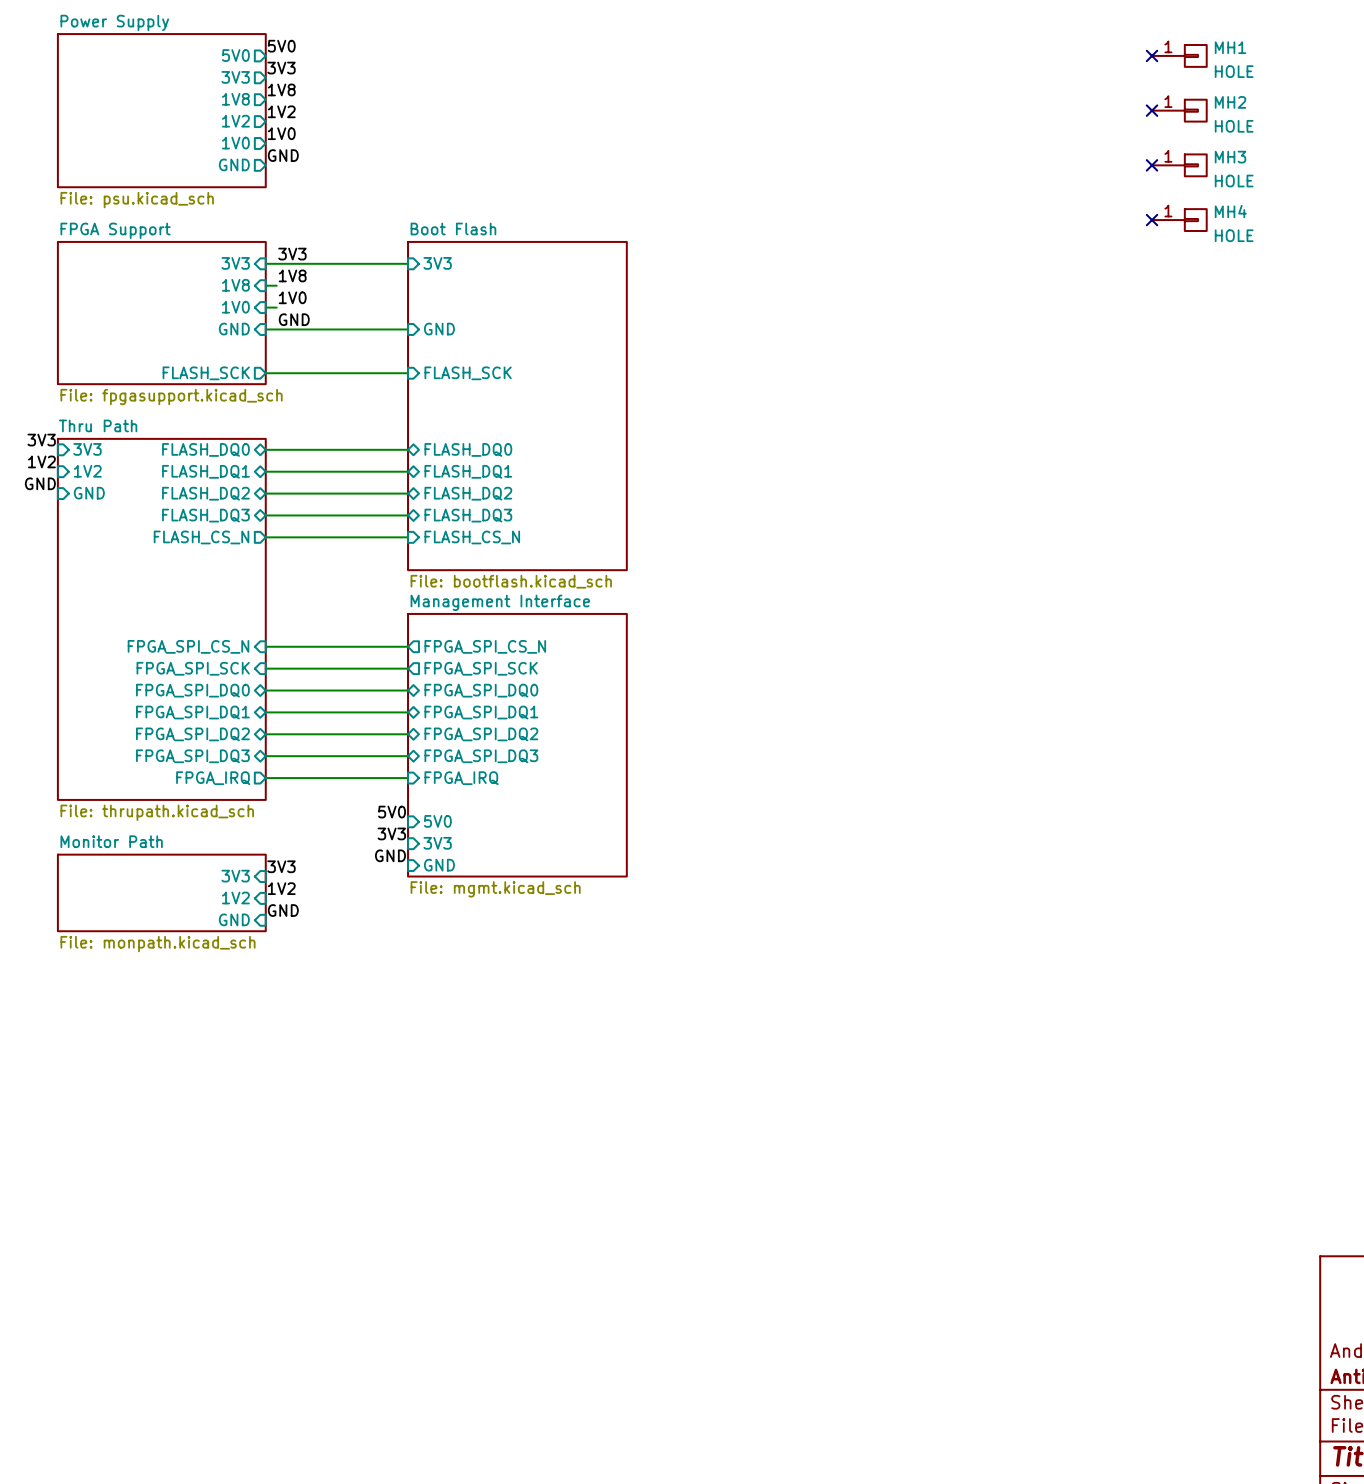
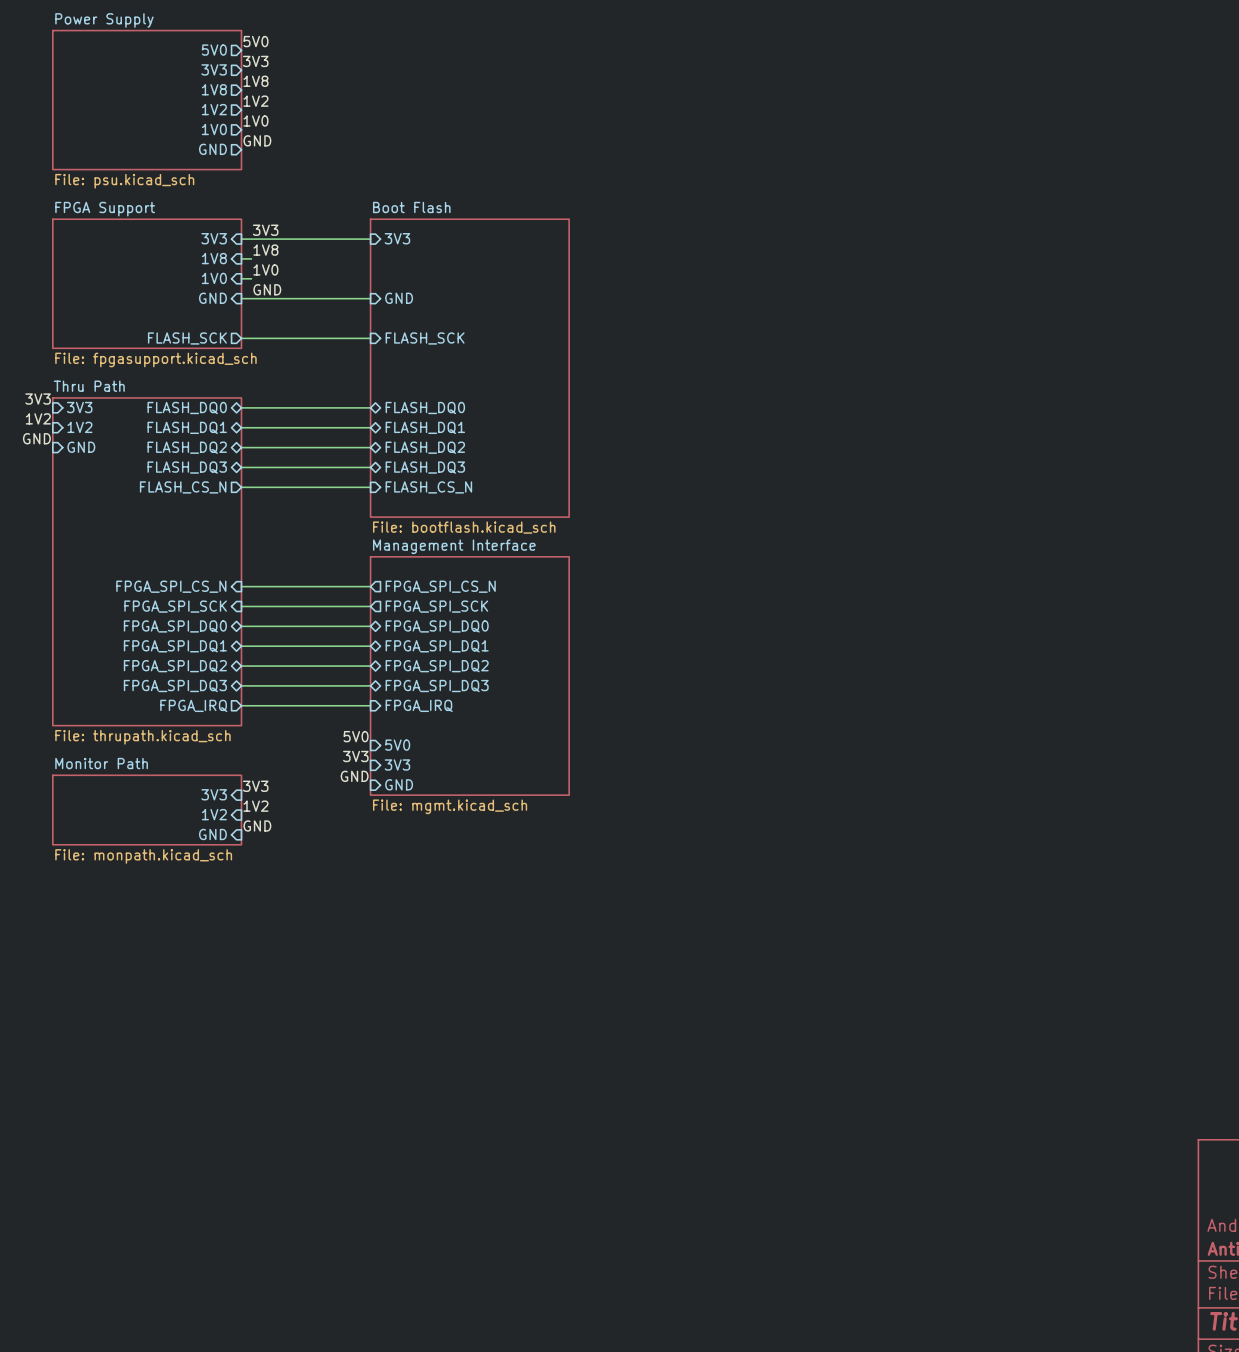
no-connect mark: (1152, 55) -> none
MH1: HOLE (1179, 55) -> none
no-connect mark: (1152, 110) -> none
MH2: HOLE (1179, 110) -> none
no-connect mark: (1152, 165) -> none
MH3: HOLE (1179, 165) -> none
no-connect mark: (1152, 220) -> none
MH4: HOLE (1179, 220) -> none

